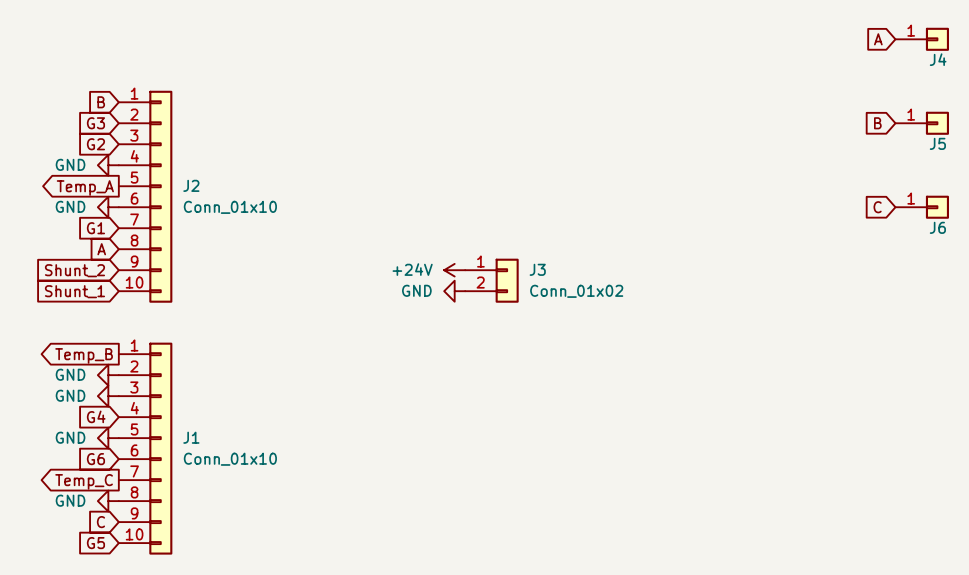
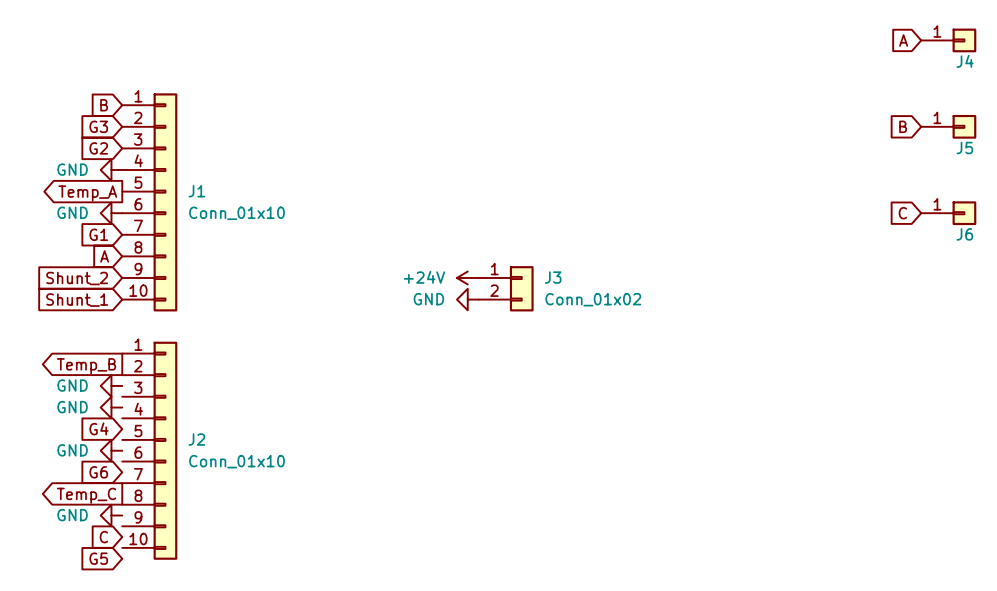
J2 name: J2 (191, 185) -> J1 (196, 191)
J2: none -> Conn_01x10 (149, 450)
J1: Conn_01x10 (145, 448) -> none

